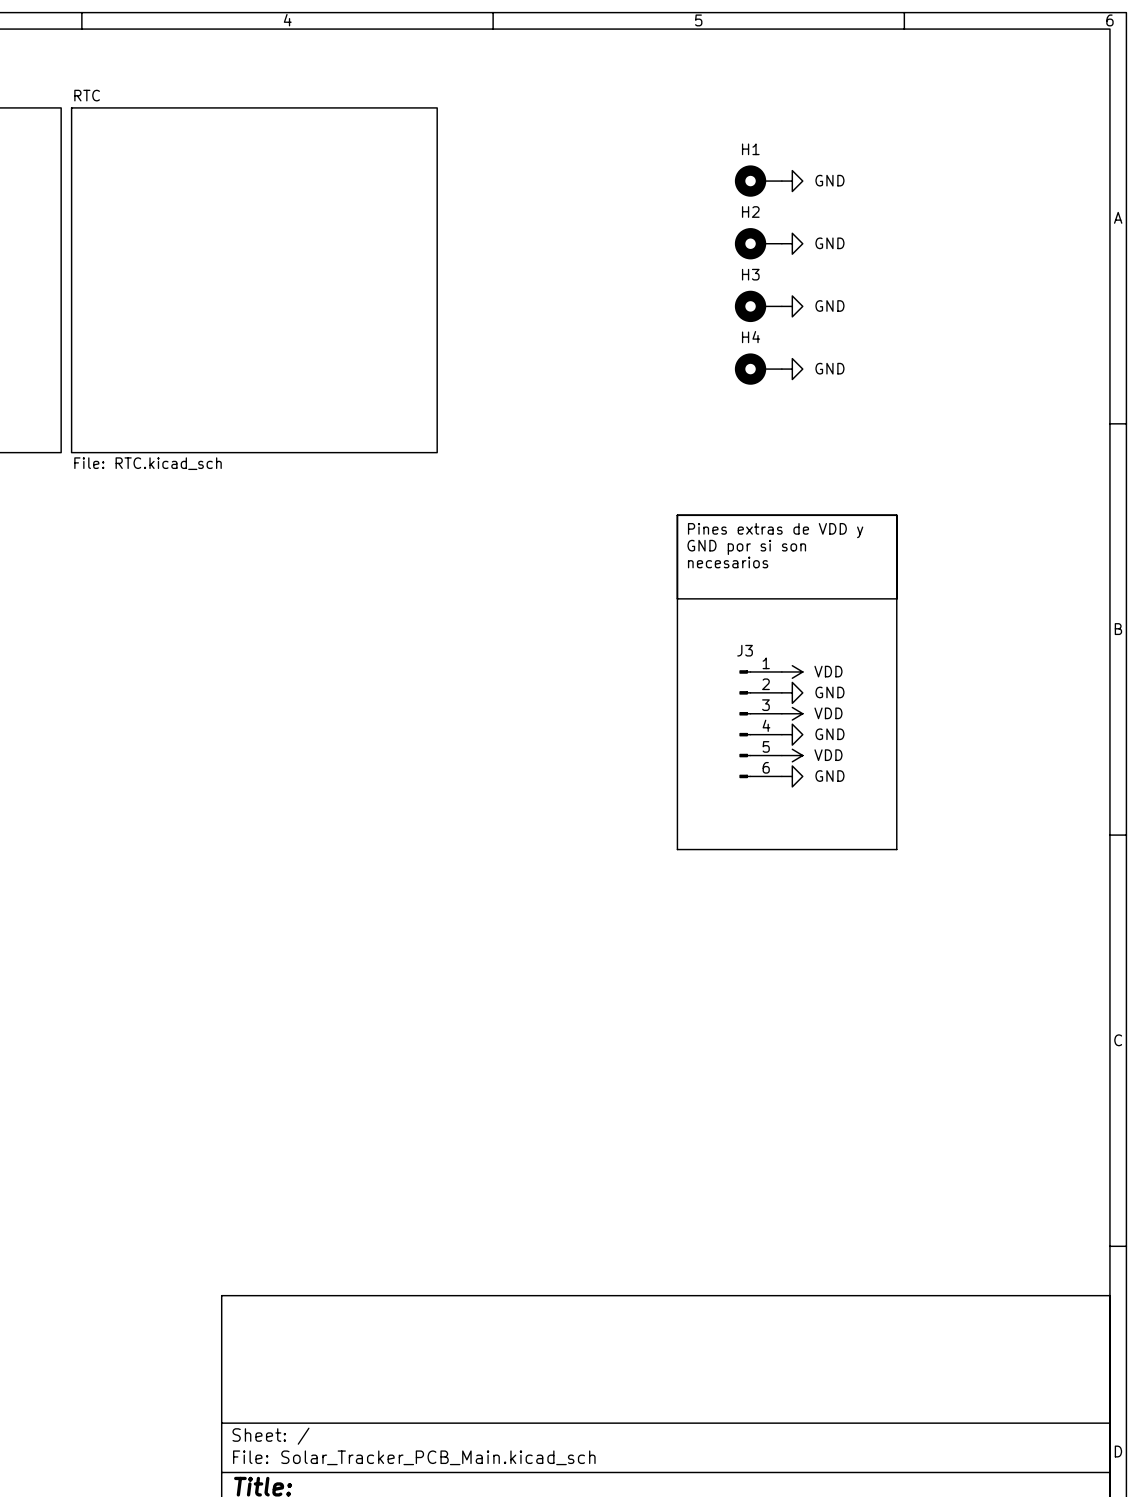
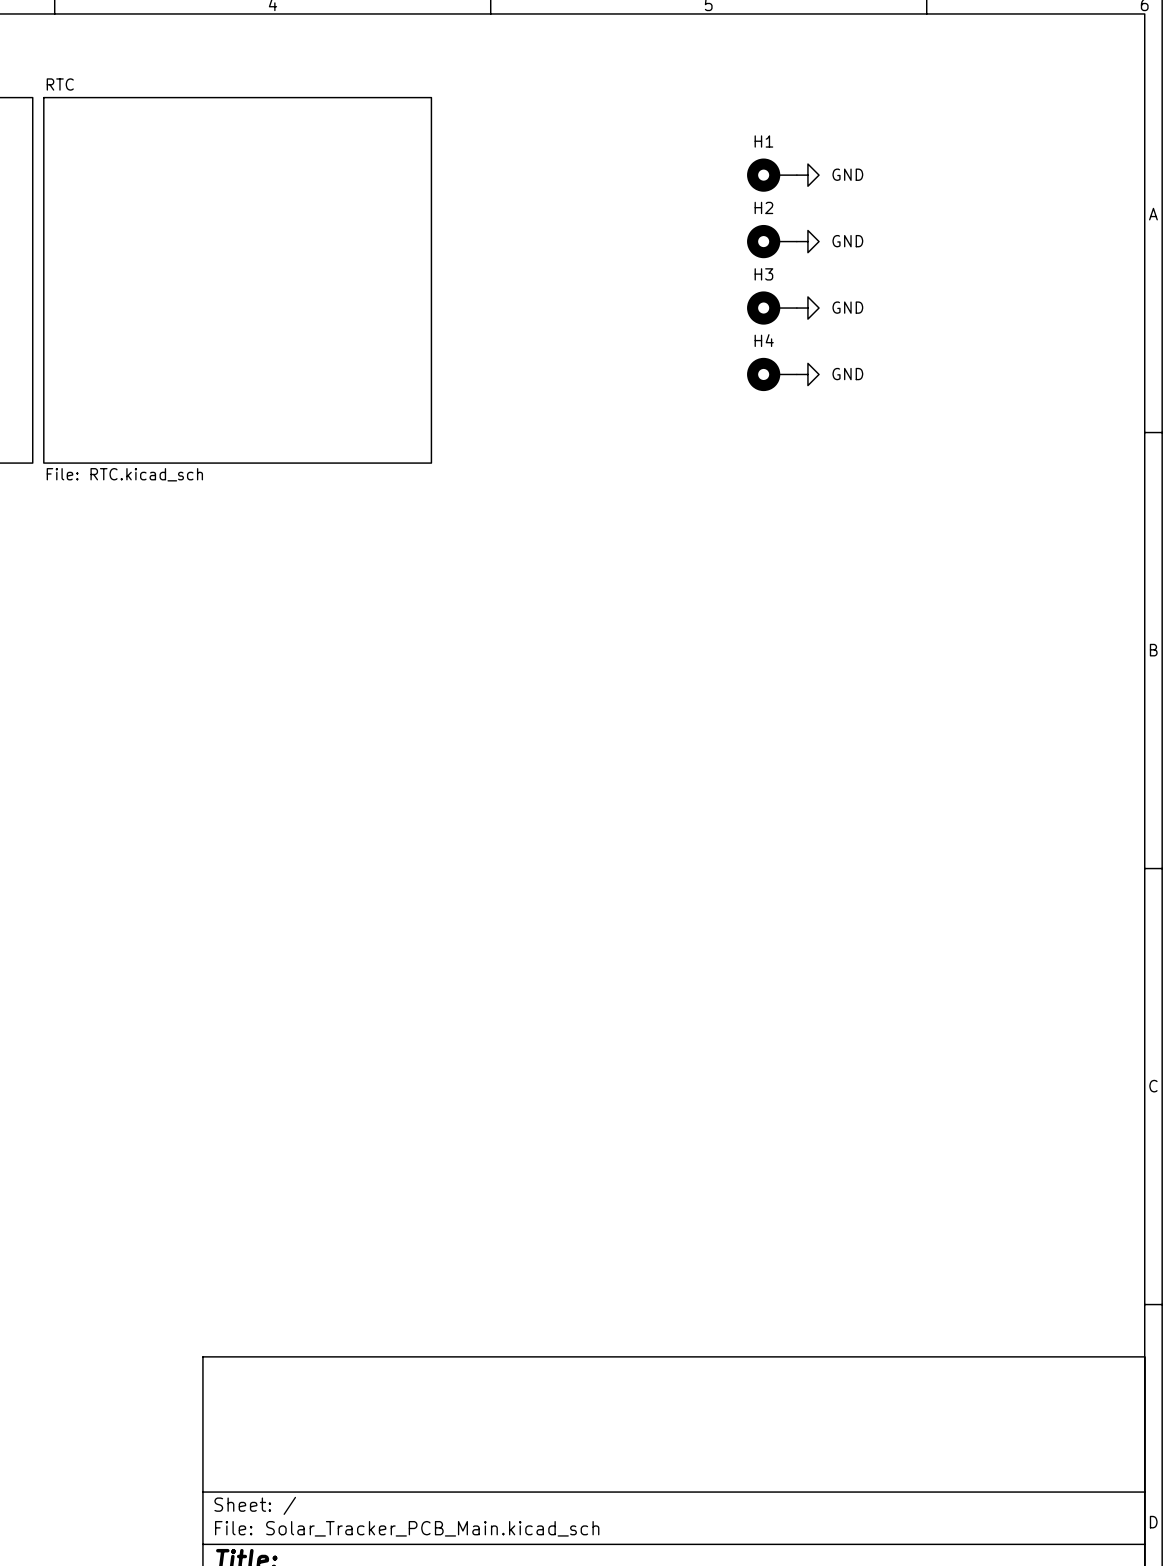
line: (677, 515) (896, 515) (896, 849) (677, 849) (677, 515) -> none
text: Pines extras de VDD y (775, 530) -> none
text: GND por si son (746, 547) -> none
text: necesarios (728, 562) -> none
line: (677, 598) (896, 598) -> none
power symbol: VDD (792, 671) -> none
power symbol: GND (792, 692) -> none
power symbol: VDD (792, 713) -> none
J3: (760, 724) -> none
power symbol: GND (792, 734) -> none
power symbol: VDD (792, 755) -> none
power symbol: GND (792, 776) -> none

